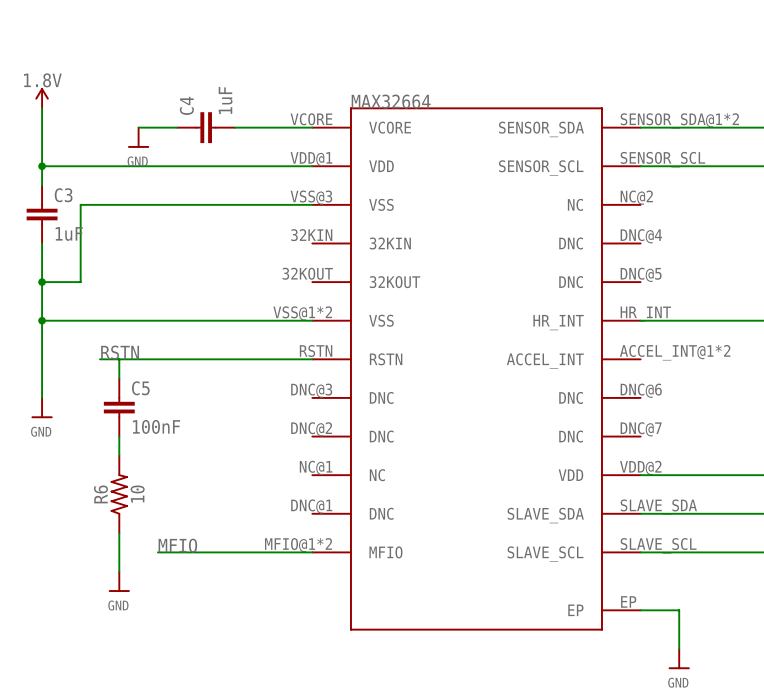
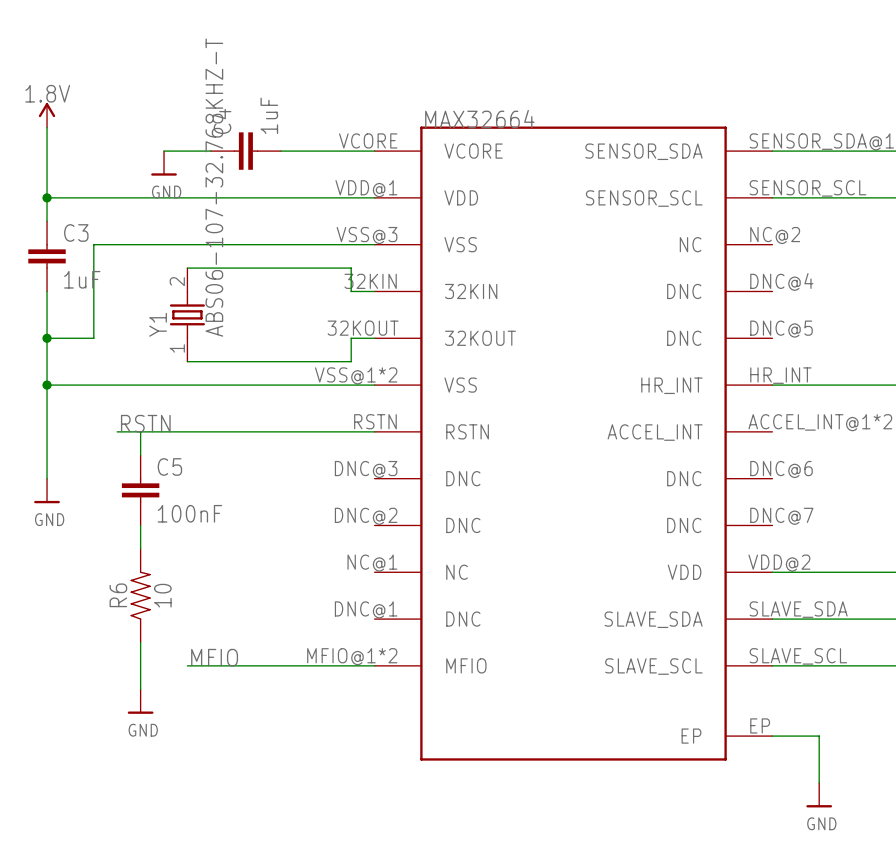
wire: none -> (187, 268) (351, 268) (351, 291) (374, 291)
Y1: none -> ABS06-107-32.768KHZ-T (187, 314)
wire: none -> (374, 338) (351, 338) (351, 361) (187, 361)

